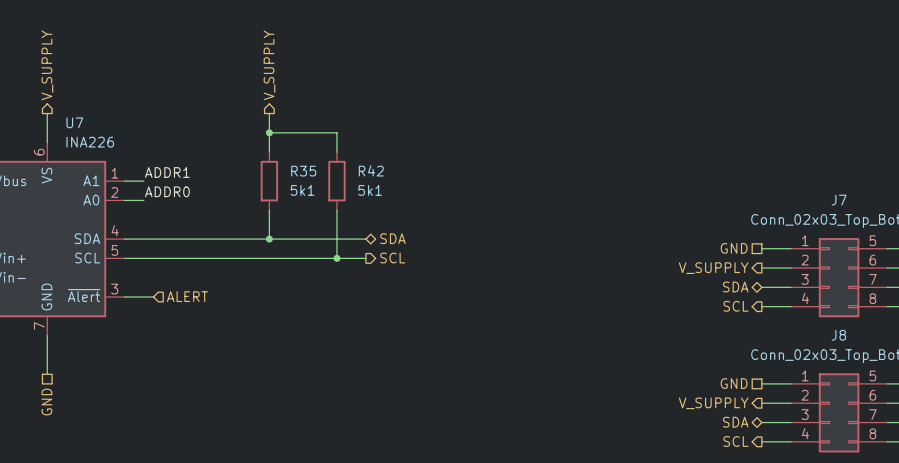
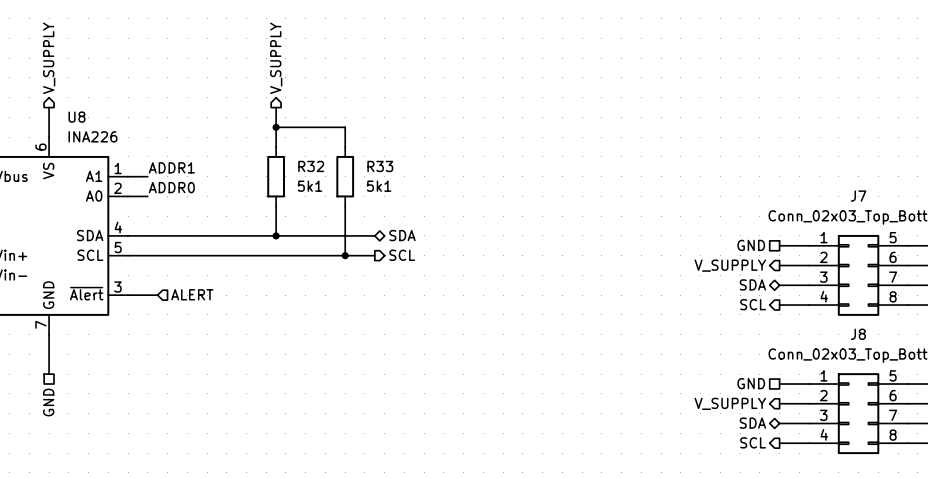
U7 name: U7 (74, 122) -> U8 (77, 117)
R42 name: R42 (371, 170) -> R33 (380, 166)
R35 name: R35 (303, 171) -> R32 (311, 166)

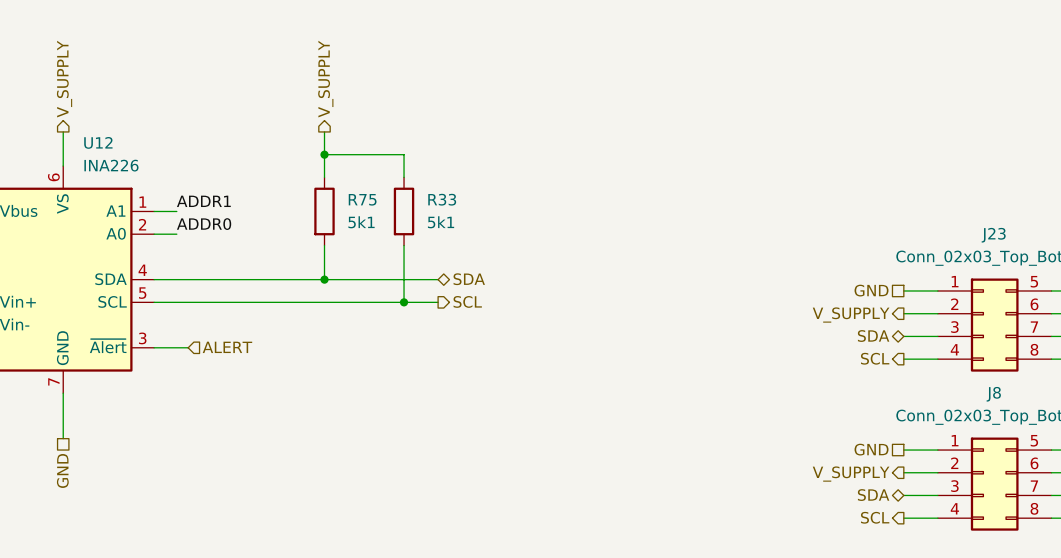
U8 name: U8 (77, 117) -> U12 (98, 142)
R32 name: R32 (311, 166) -> R75 (362, 199)
J7 name: J7 (858, 196) -> J23 (993, 235)

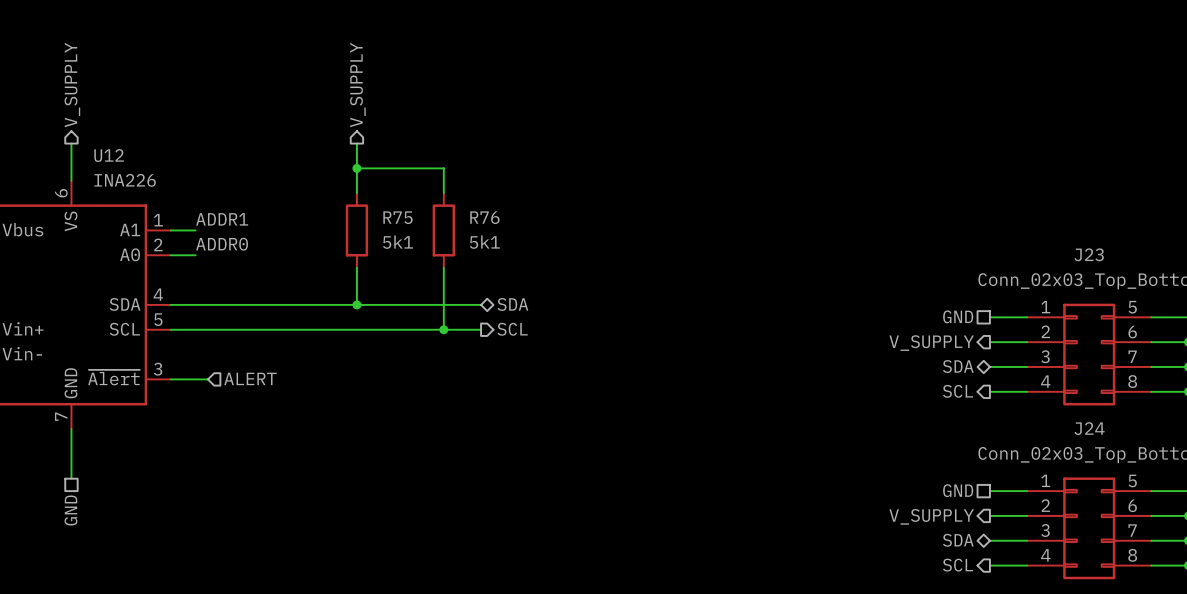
R33 name: R33 (442, 199) -> R76 (484, 217)
J8 name: J8 (993, 394) -> J24 (1089, 428)

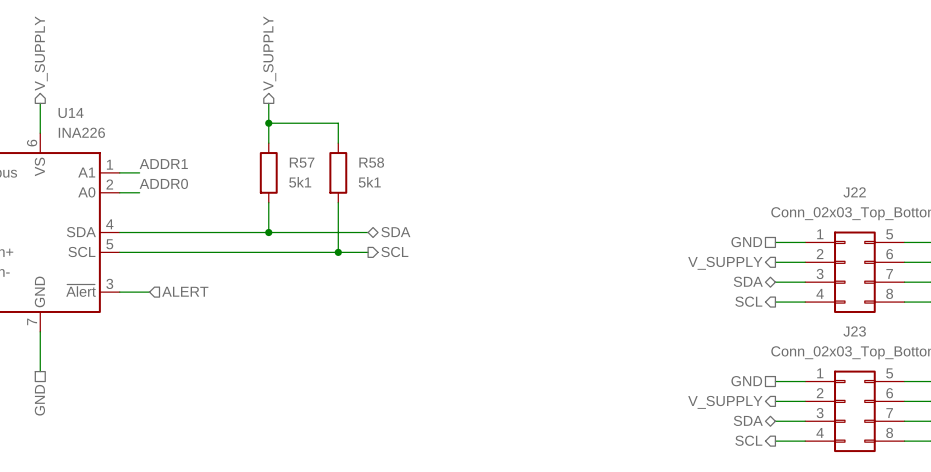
U12 name: U12 (109, 155) -> U14 (71, 113)
R75 name: R75 (397, 217) -> R57 (302, 162)
R76 name: R76 (484, 217) -> R58 (371, 162)
J23 name: J23 (1089, 254) -> J22 (854, 192)
J24 name: J24 (1089, 428) -> J23 (854, 331)

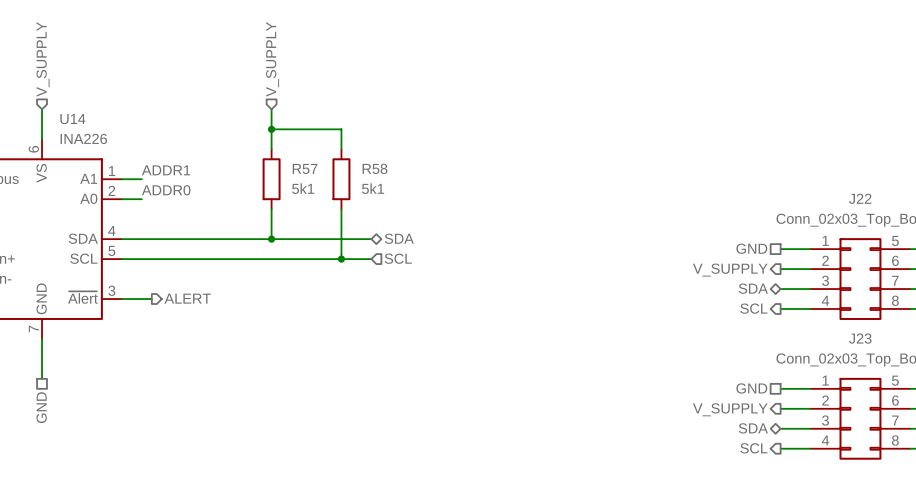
hierarchical label shape: output (41, 53) -> input (43, 59)
hierarchical label shape: output (269, 53) -> input (272, 59)
hierarchical label shape: output (394, 252) -> input (398, 258)
hierarchical label shape: input (185, 291) -> output (187, 298)

